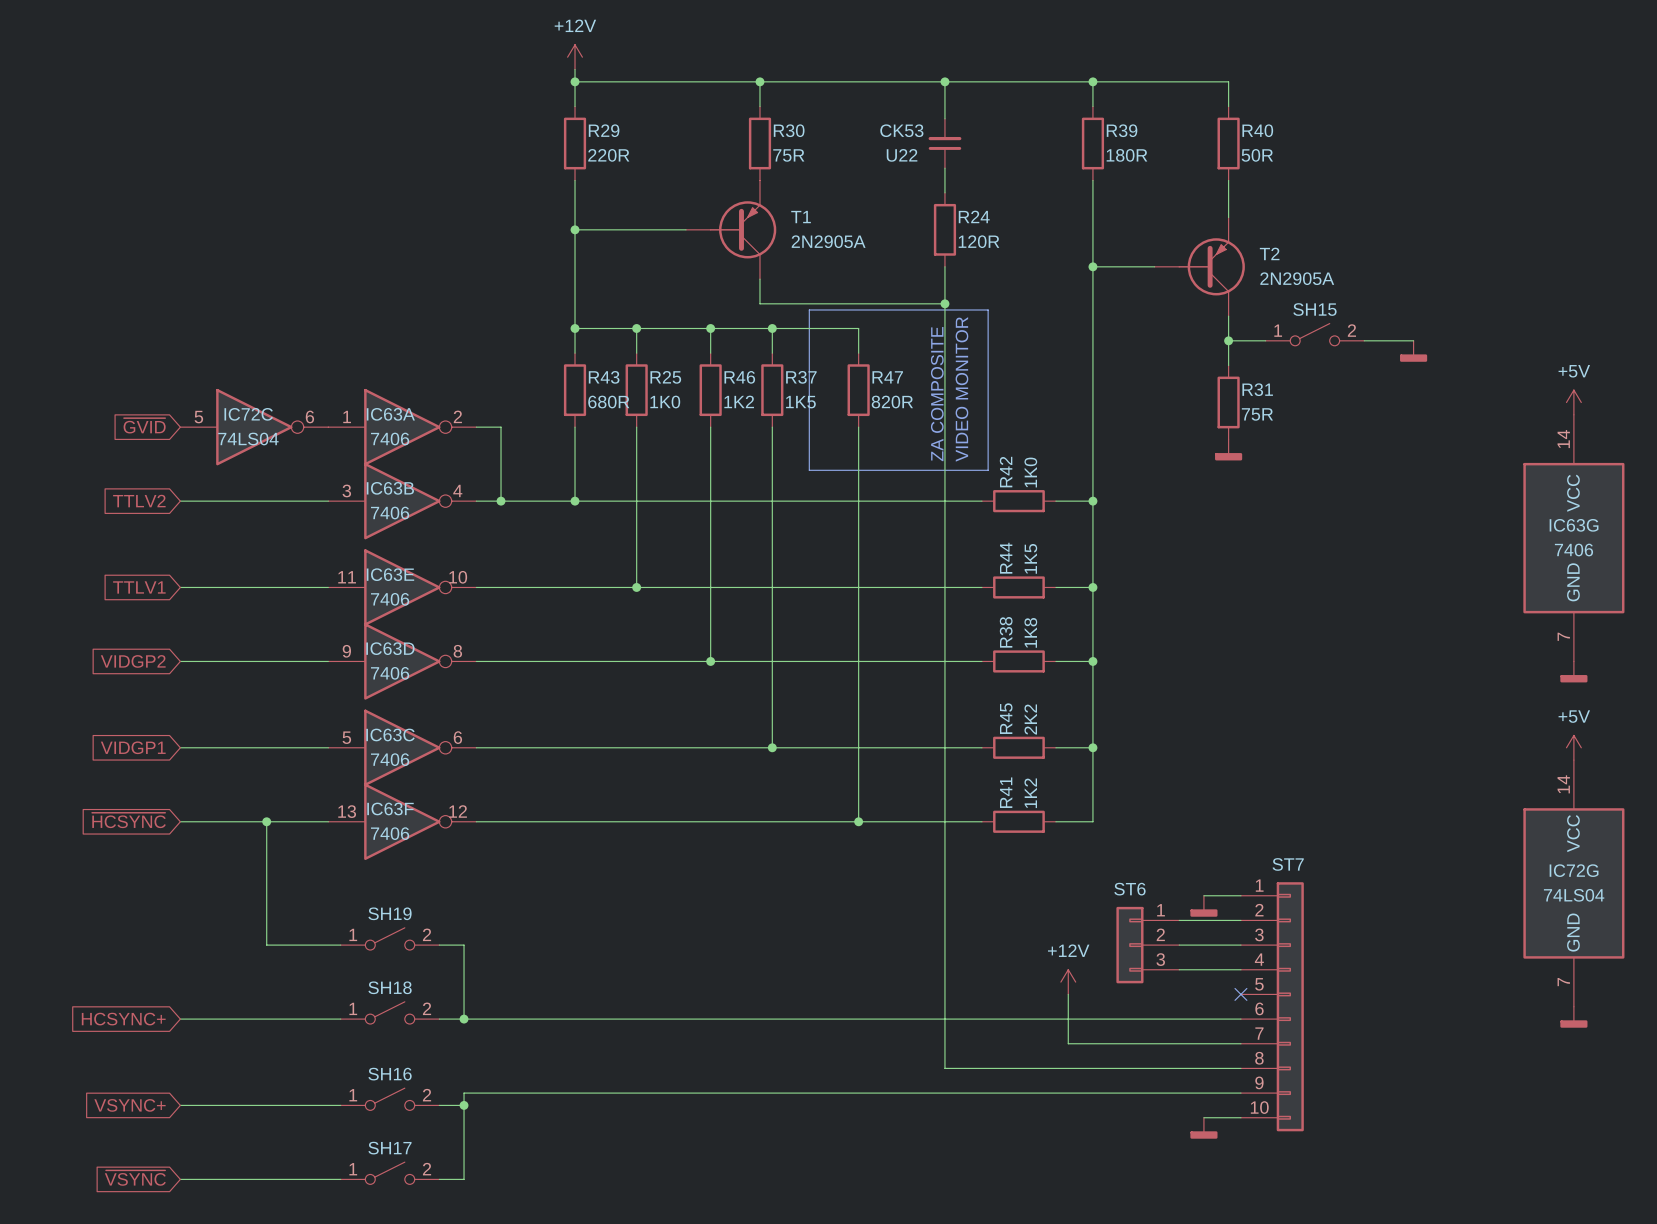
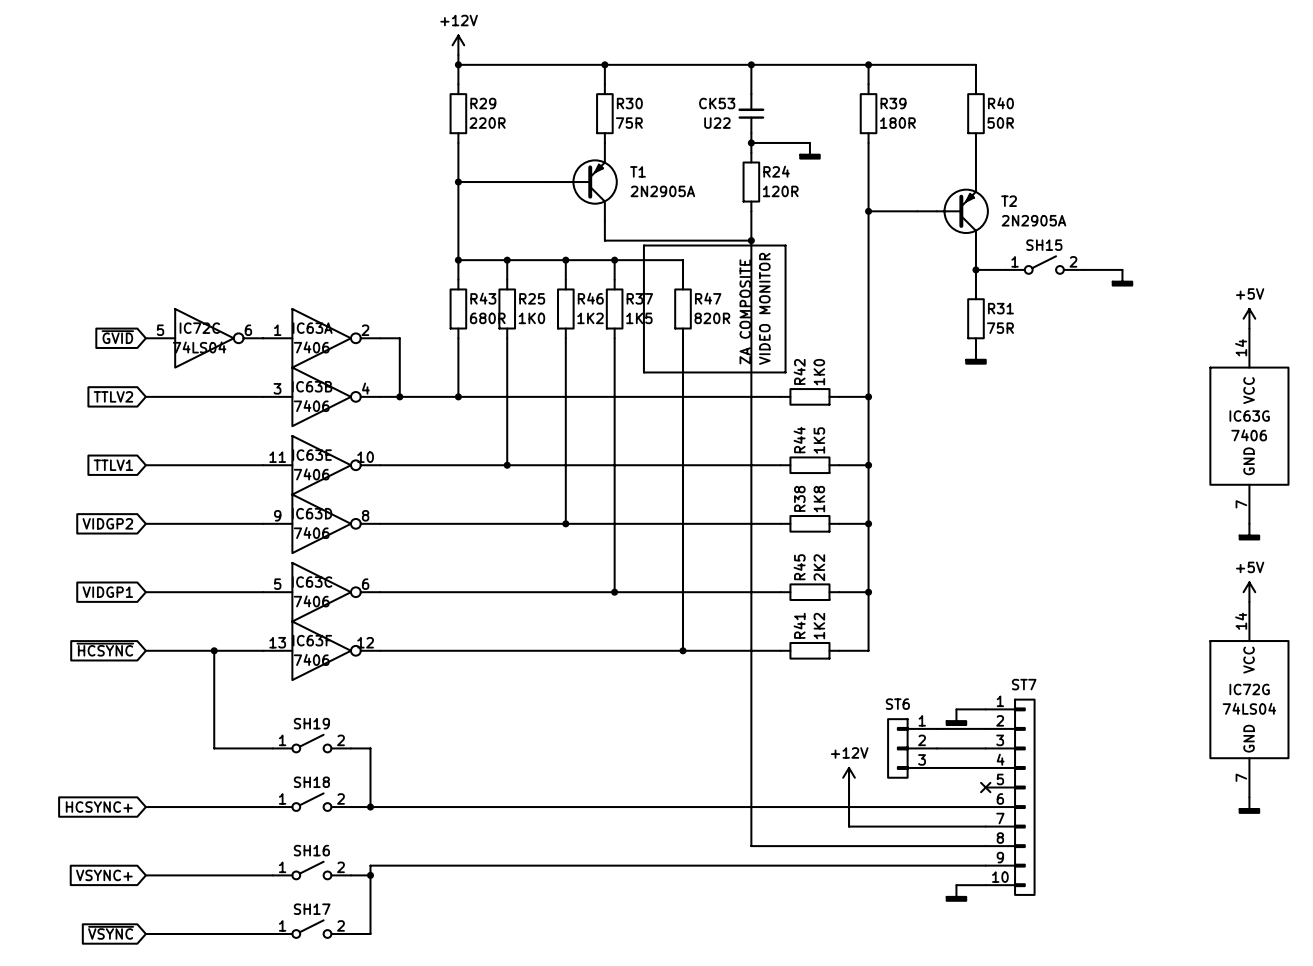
wire: none -> (751, 142) (809, 142)
junction: none -> (751, 142)
power symbol: none -> (809, 151)

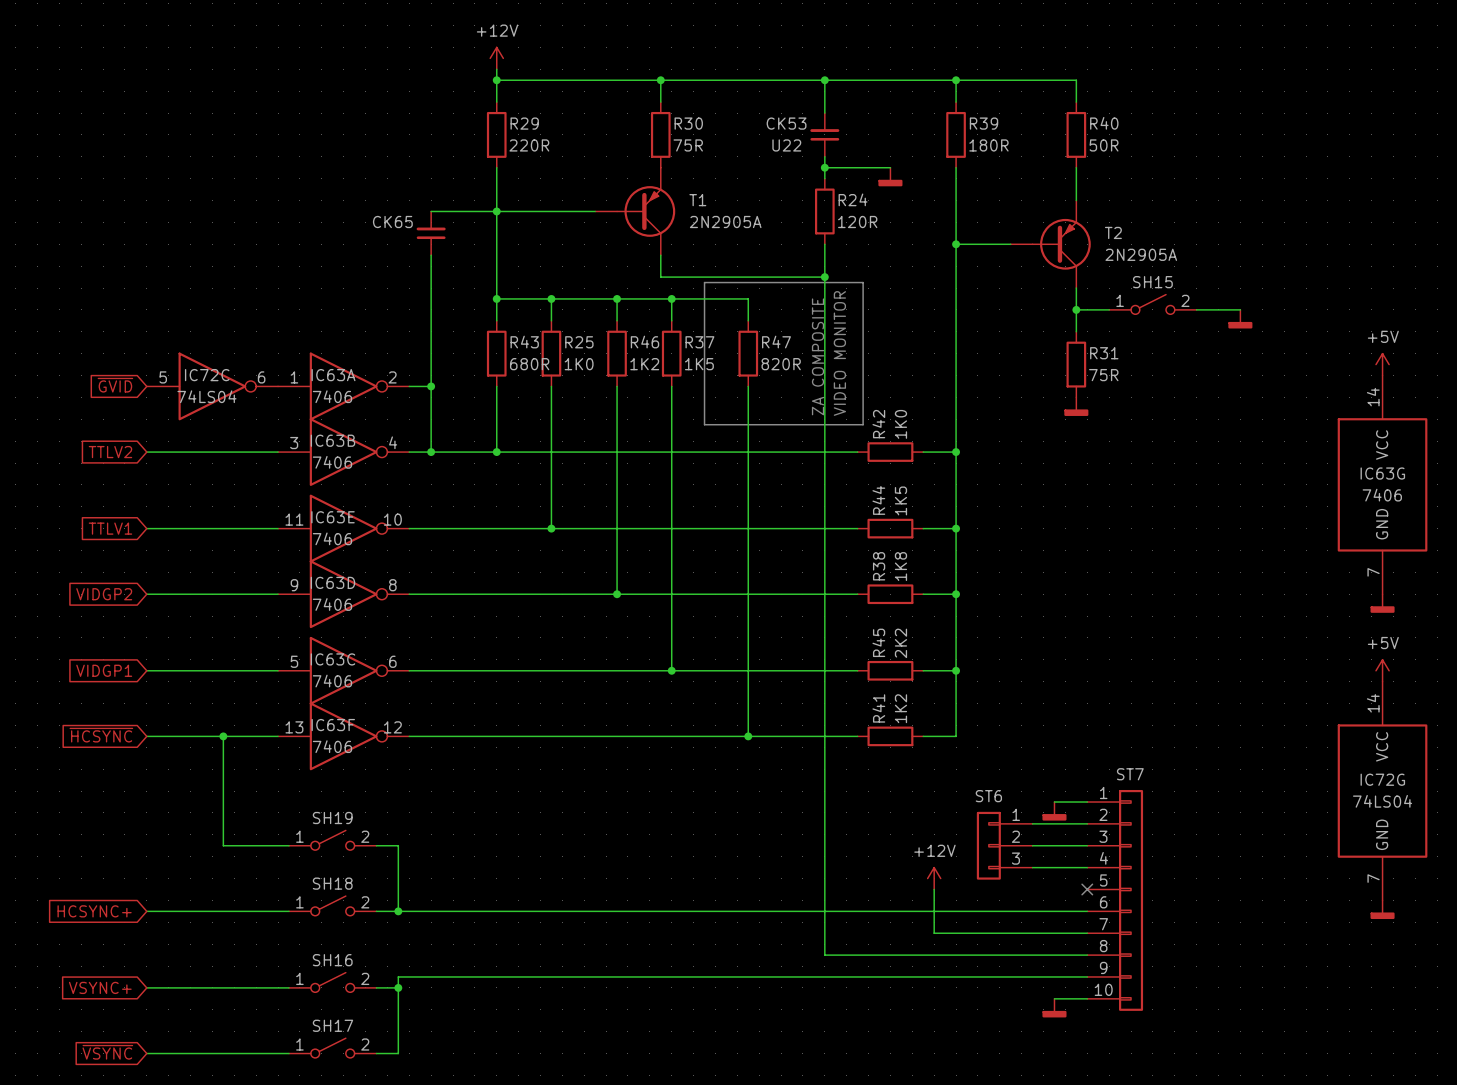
wire: none -> (431, 211) (496, 211)
CK65: none -> (431, 233)
wire: none -> (431, 255) (431, 386)
junction: none -> (431, 386)

